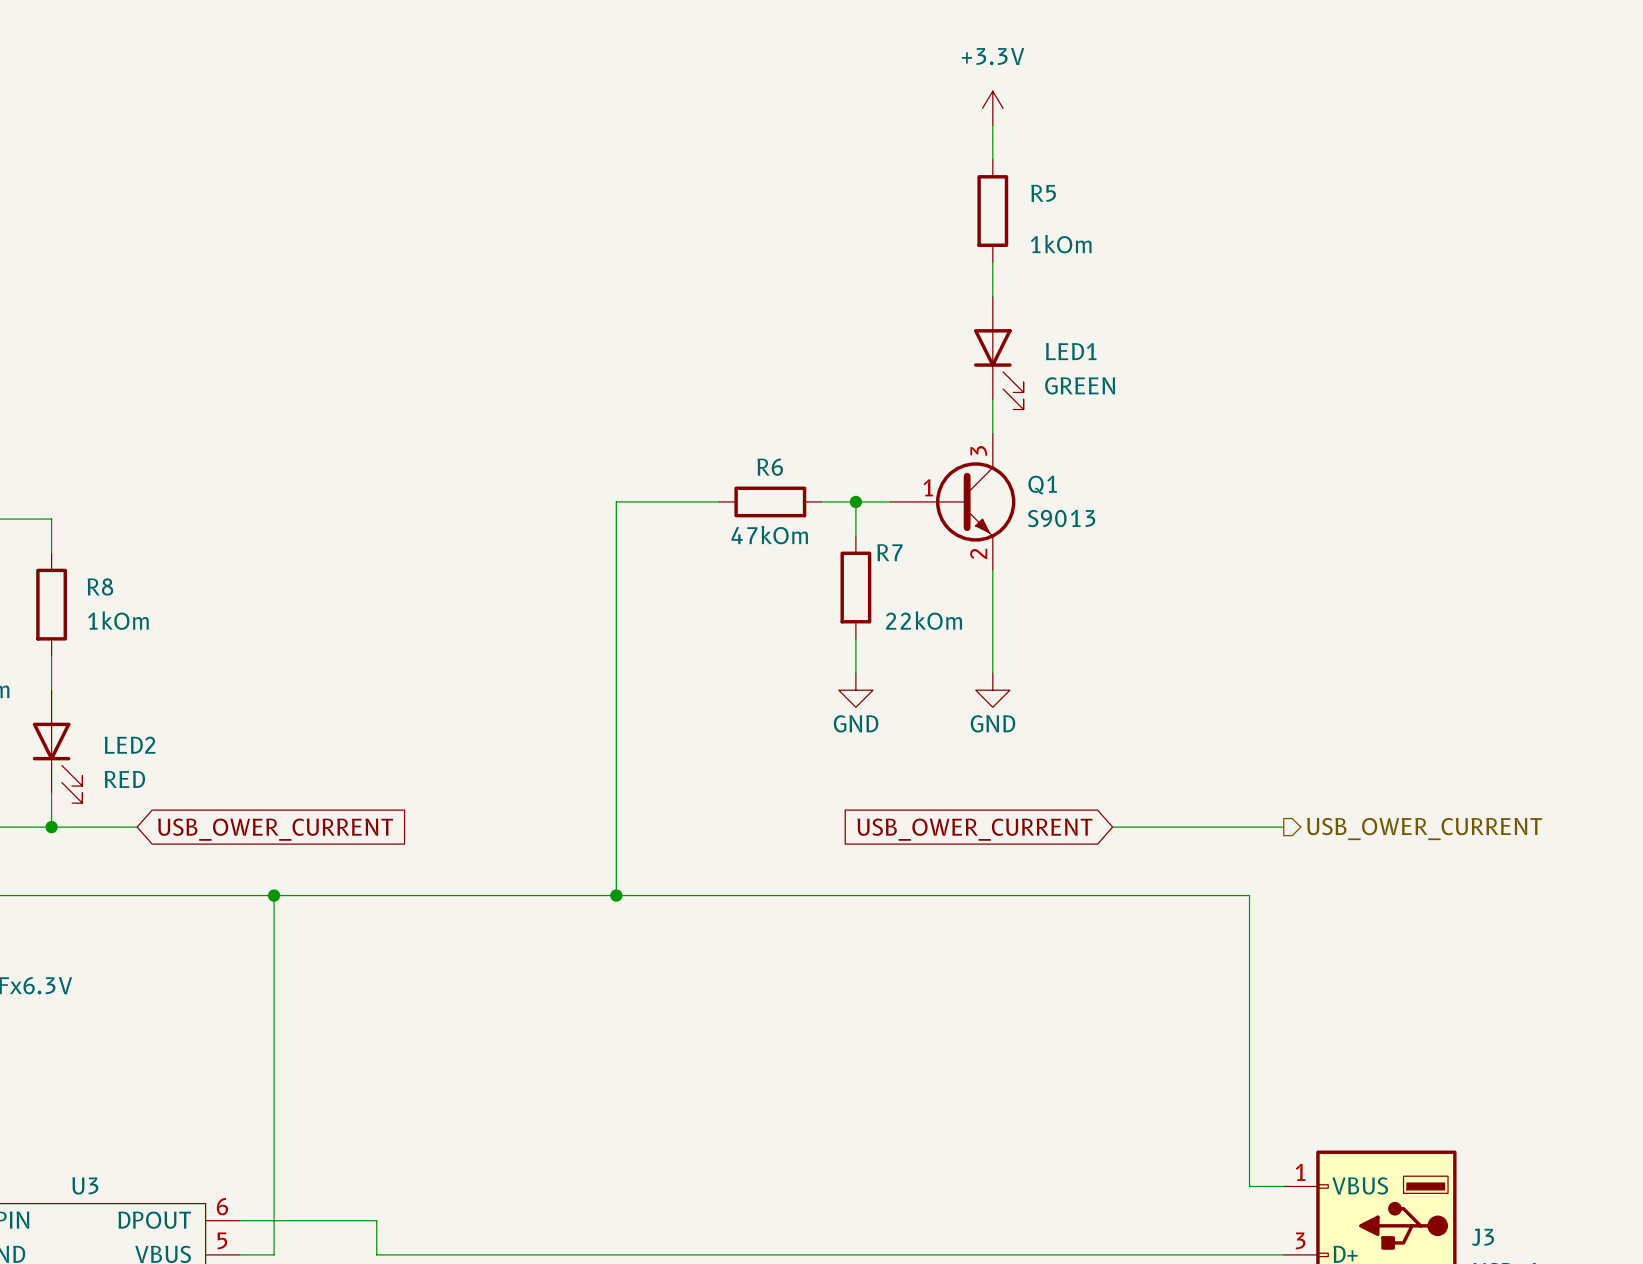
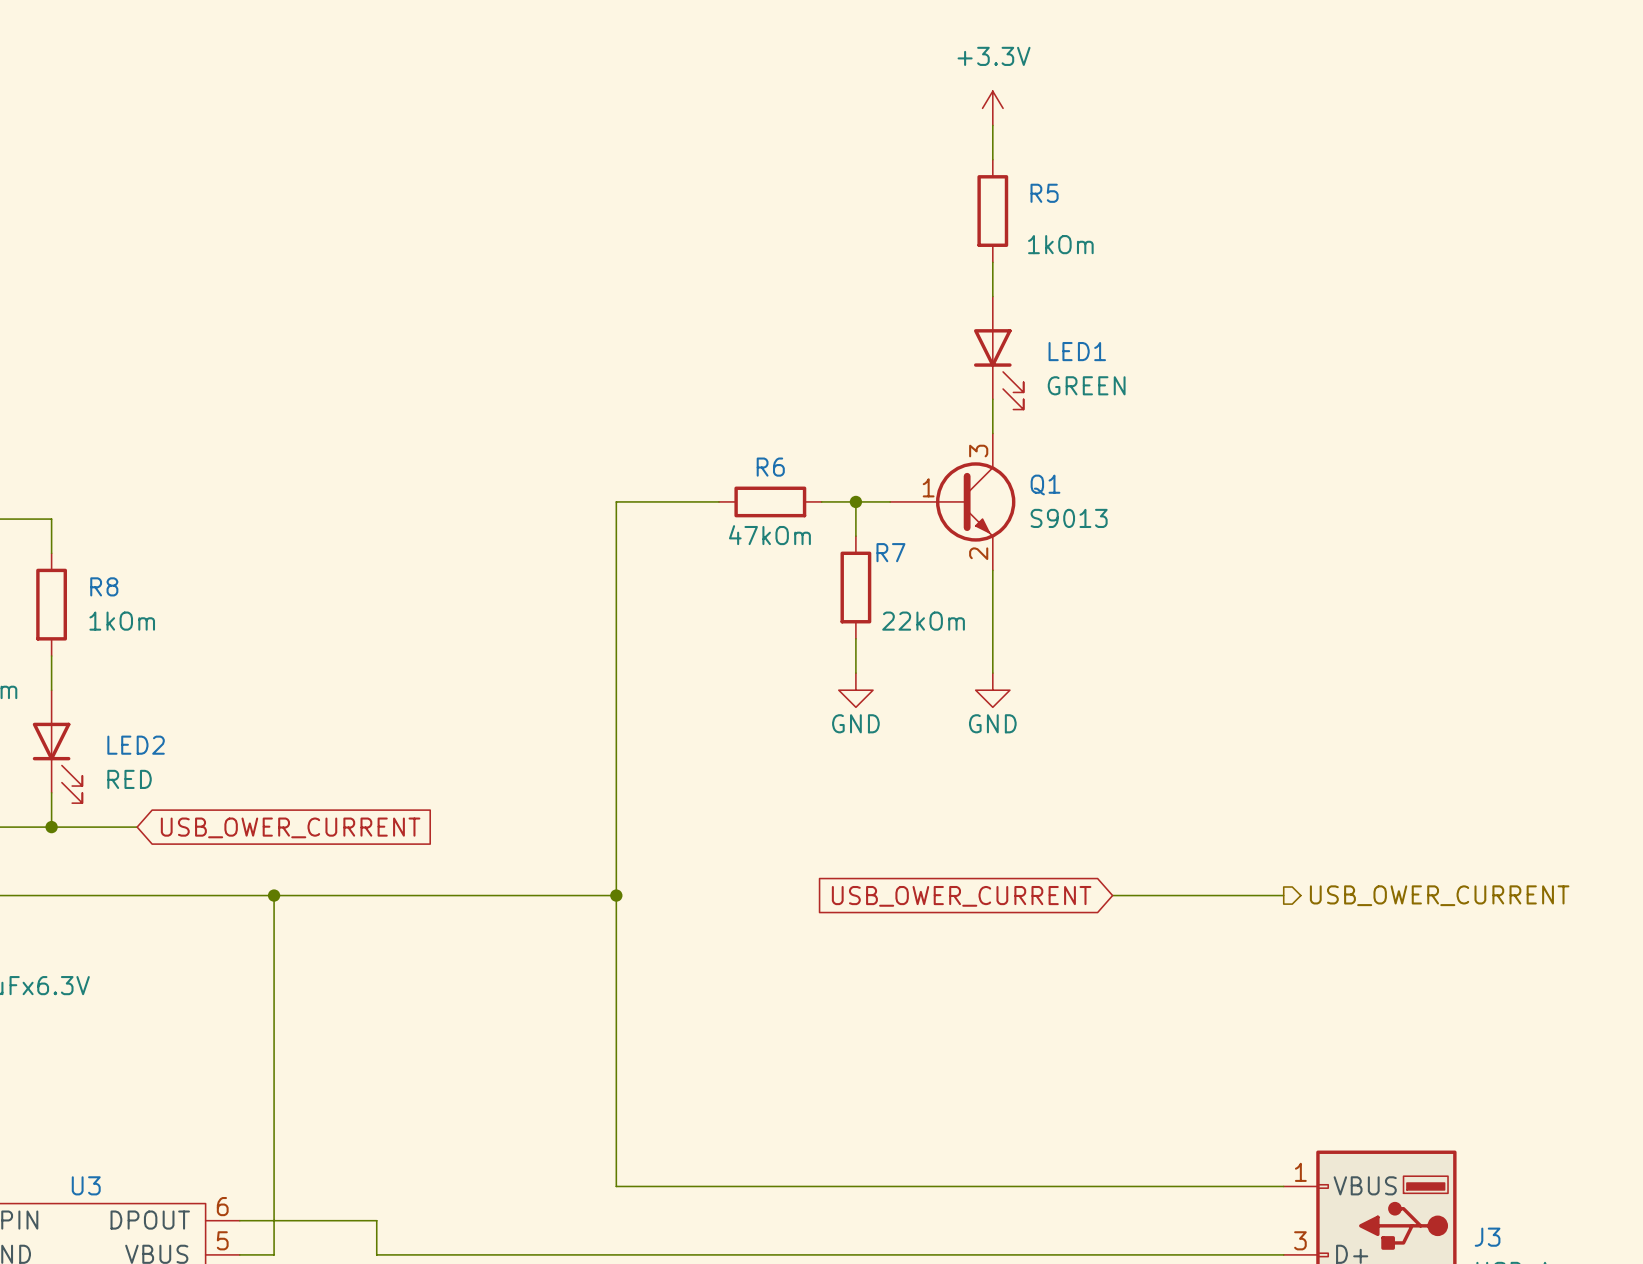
wire: (1112, 827) (1283, 827) -> none
global label position: USB_OWER_CURRENT (974, 829) -> USB_OWER_CURRENT (961, 896)
hierarchical label position: USB_OWER_CURRENT (1424, 829) -> USB_OWER_CURRENT (1439, 895)
wire: (616, 895) (1112, 895) -> (616, 895) (616, 1186) (1249, 1186)
wire: (1249, 895) (1249, 1186) -> (1249, 895) (1283, 895)

